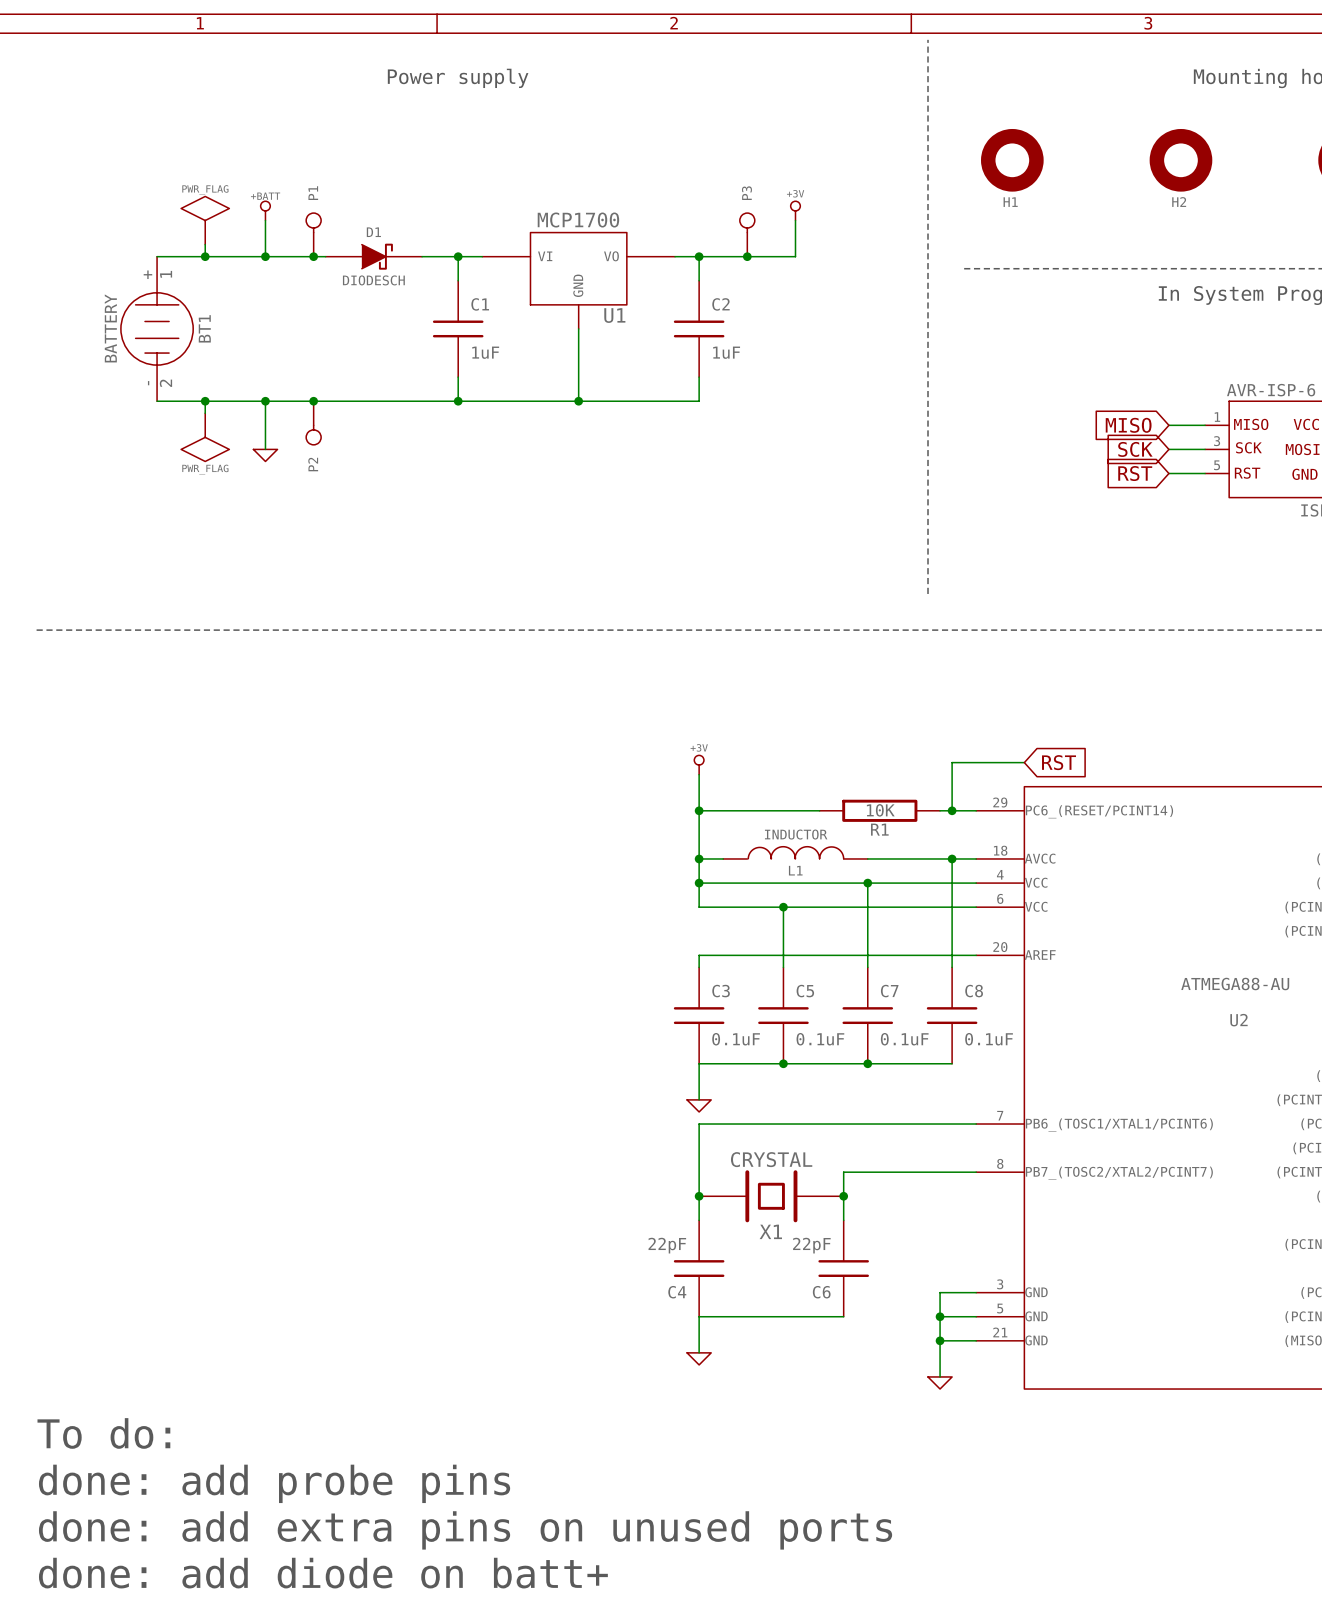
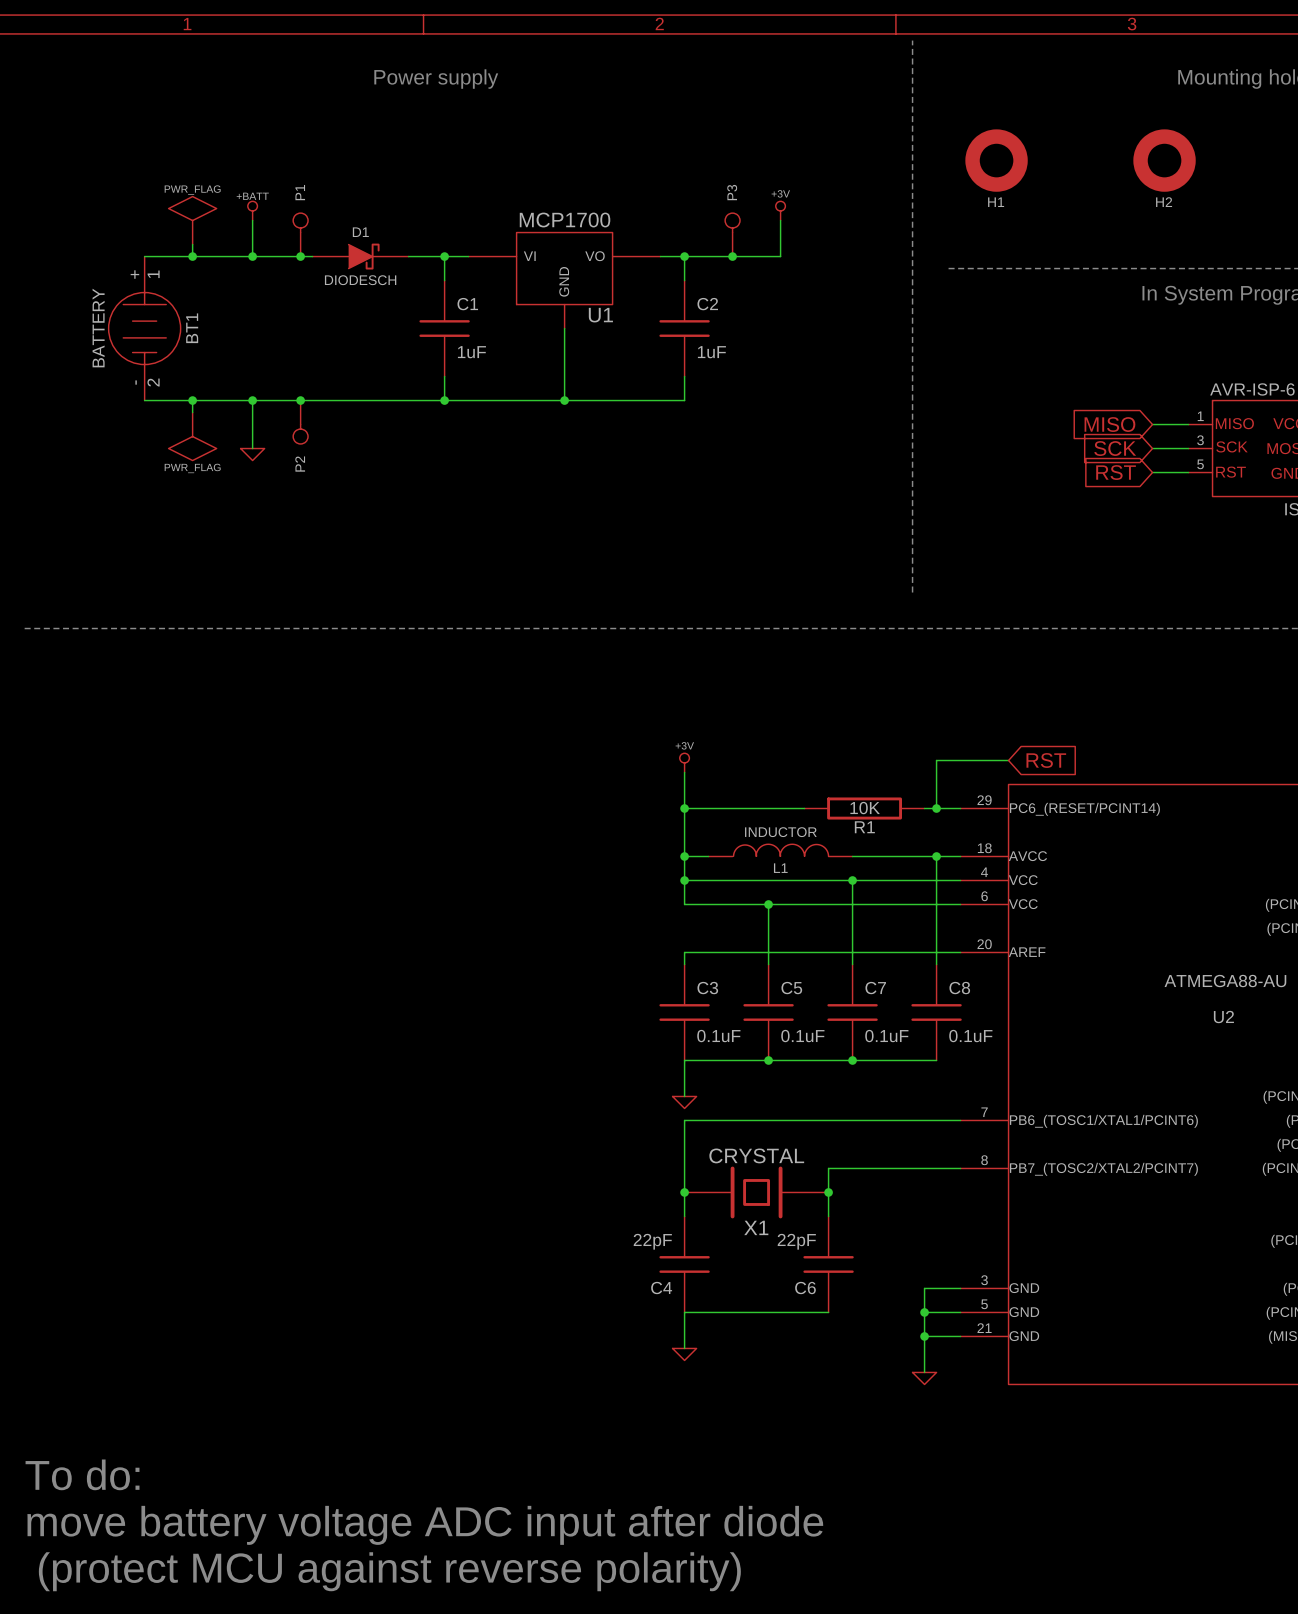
text: To do: (103, 1433) -> none
text: done: add probe pins (274, 1483) -> To do: (82, 1474)
text: done: add extra pins on unused ports (465, 1530) -> move battery voltage ADC input after diode (425, 1525)
text: done: add diode on batt+ (323, 1573) -> (protect MCU against reverse polarity) (389, 1571)

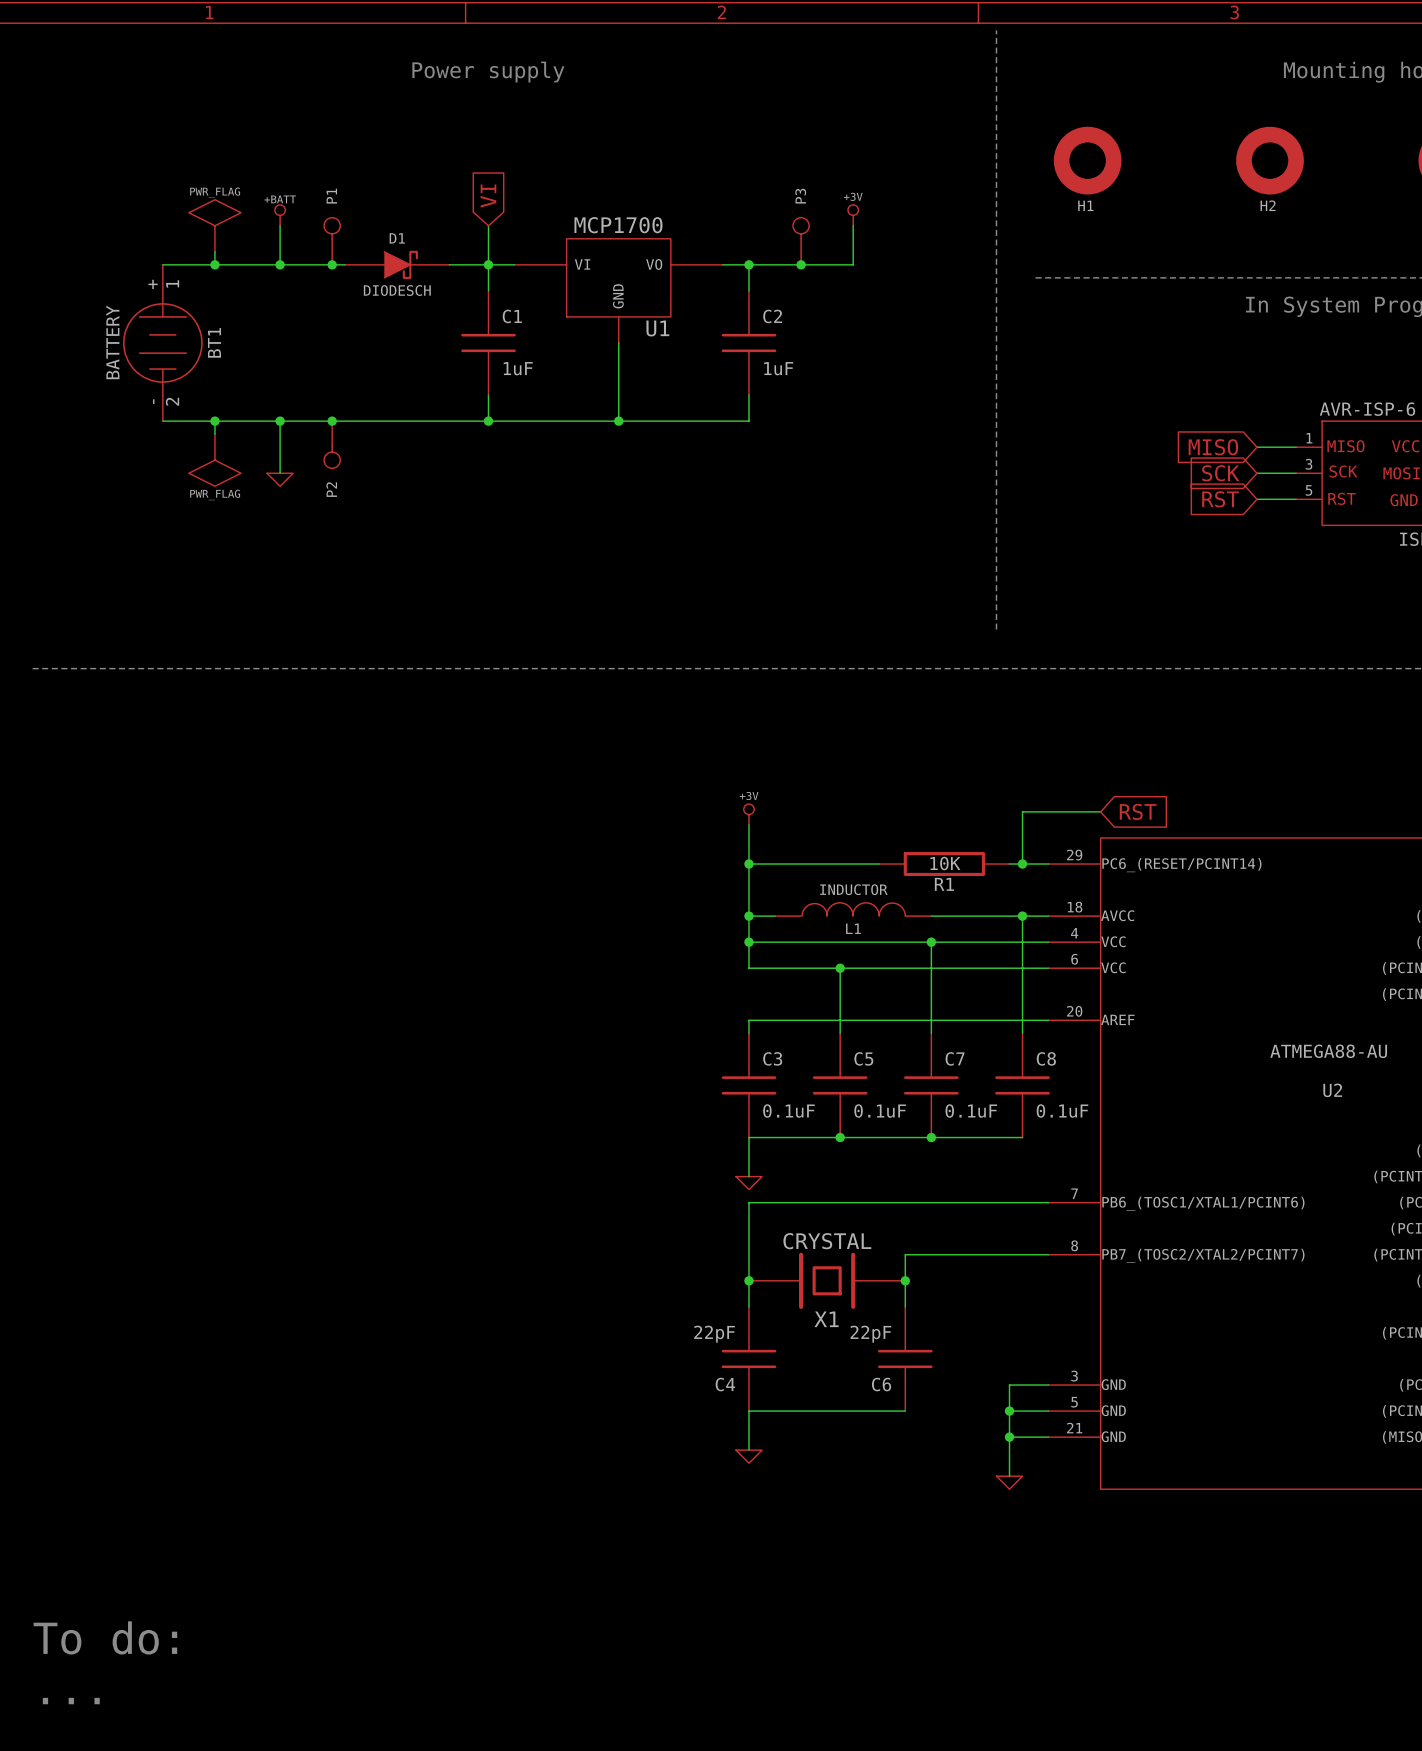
global label: none -> VI (488, 196)
wire: none -> (488, 225) (488, 264)
text: To do: (82, 1474) -> none
text: move battery voltage ADC input after diode (425, 1525) -> To do: (105, 1637)
text: (protect MCU against reverse polarity) (389, 1571) -> ... (71, 1701)

